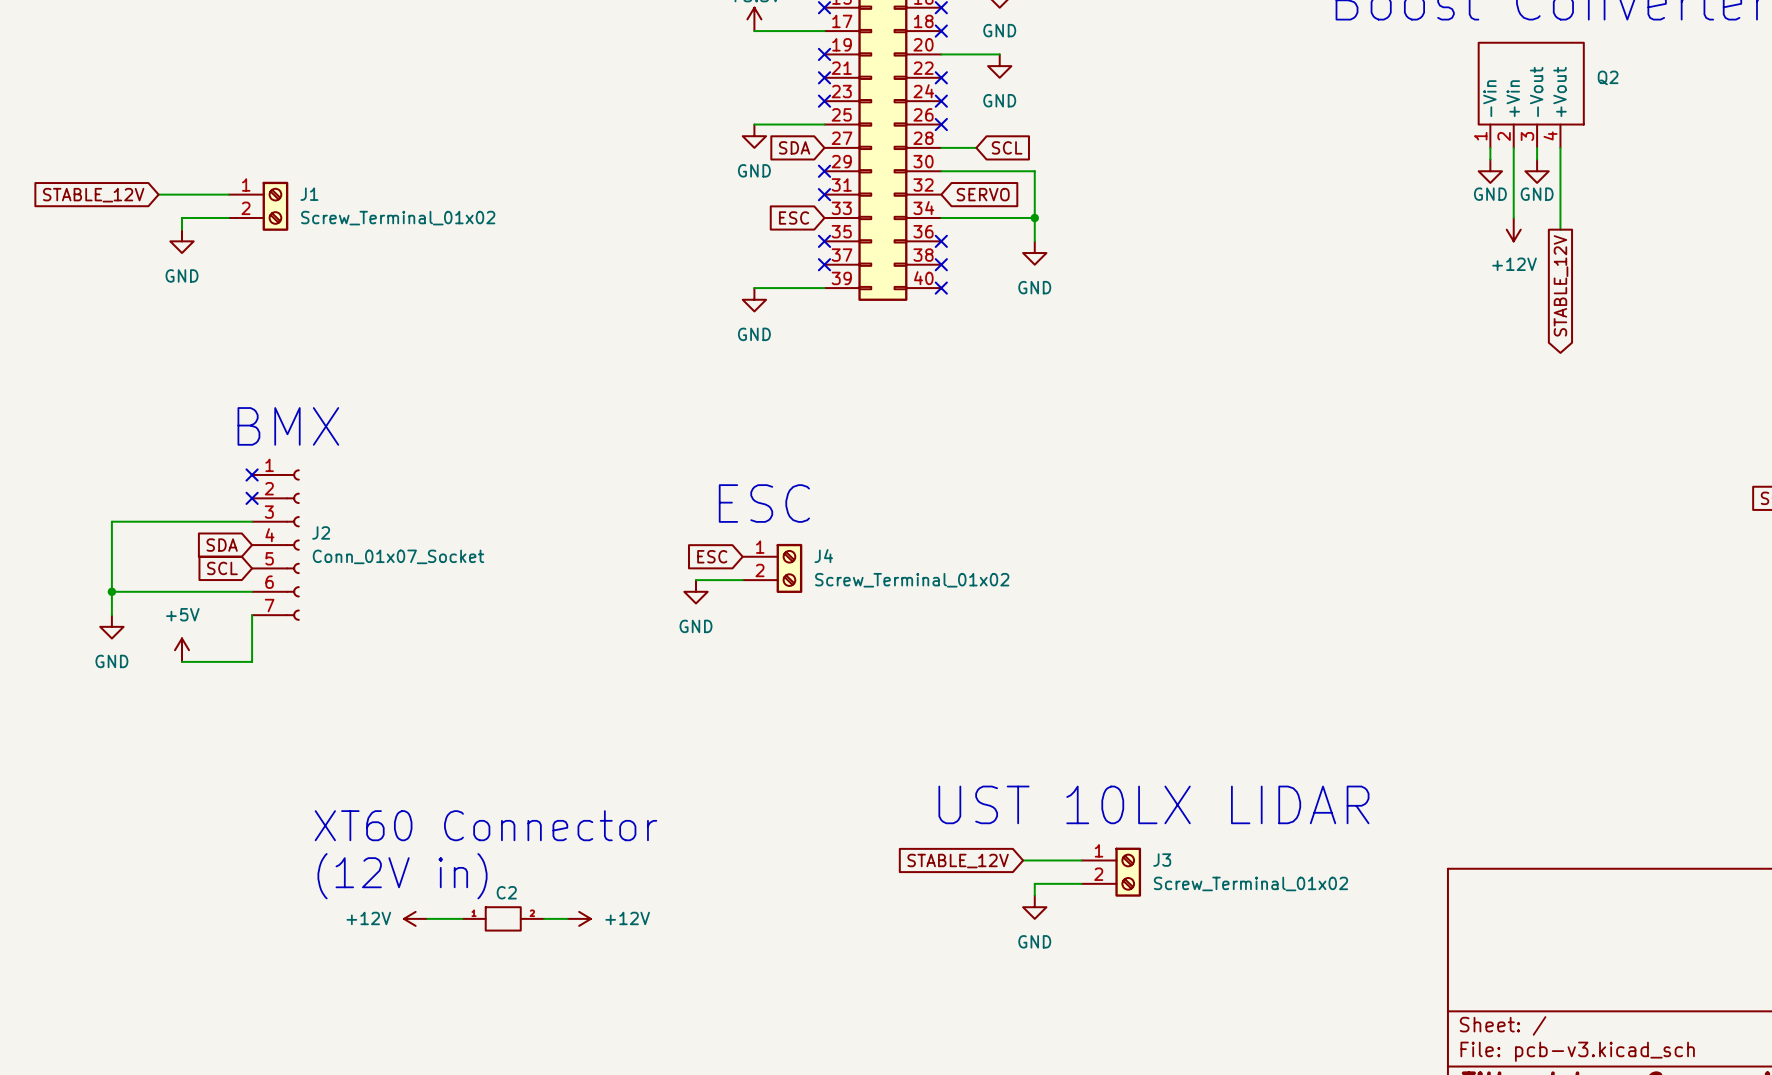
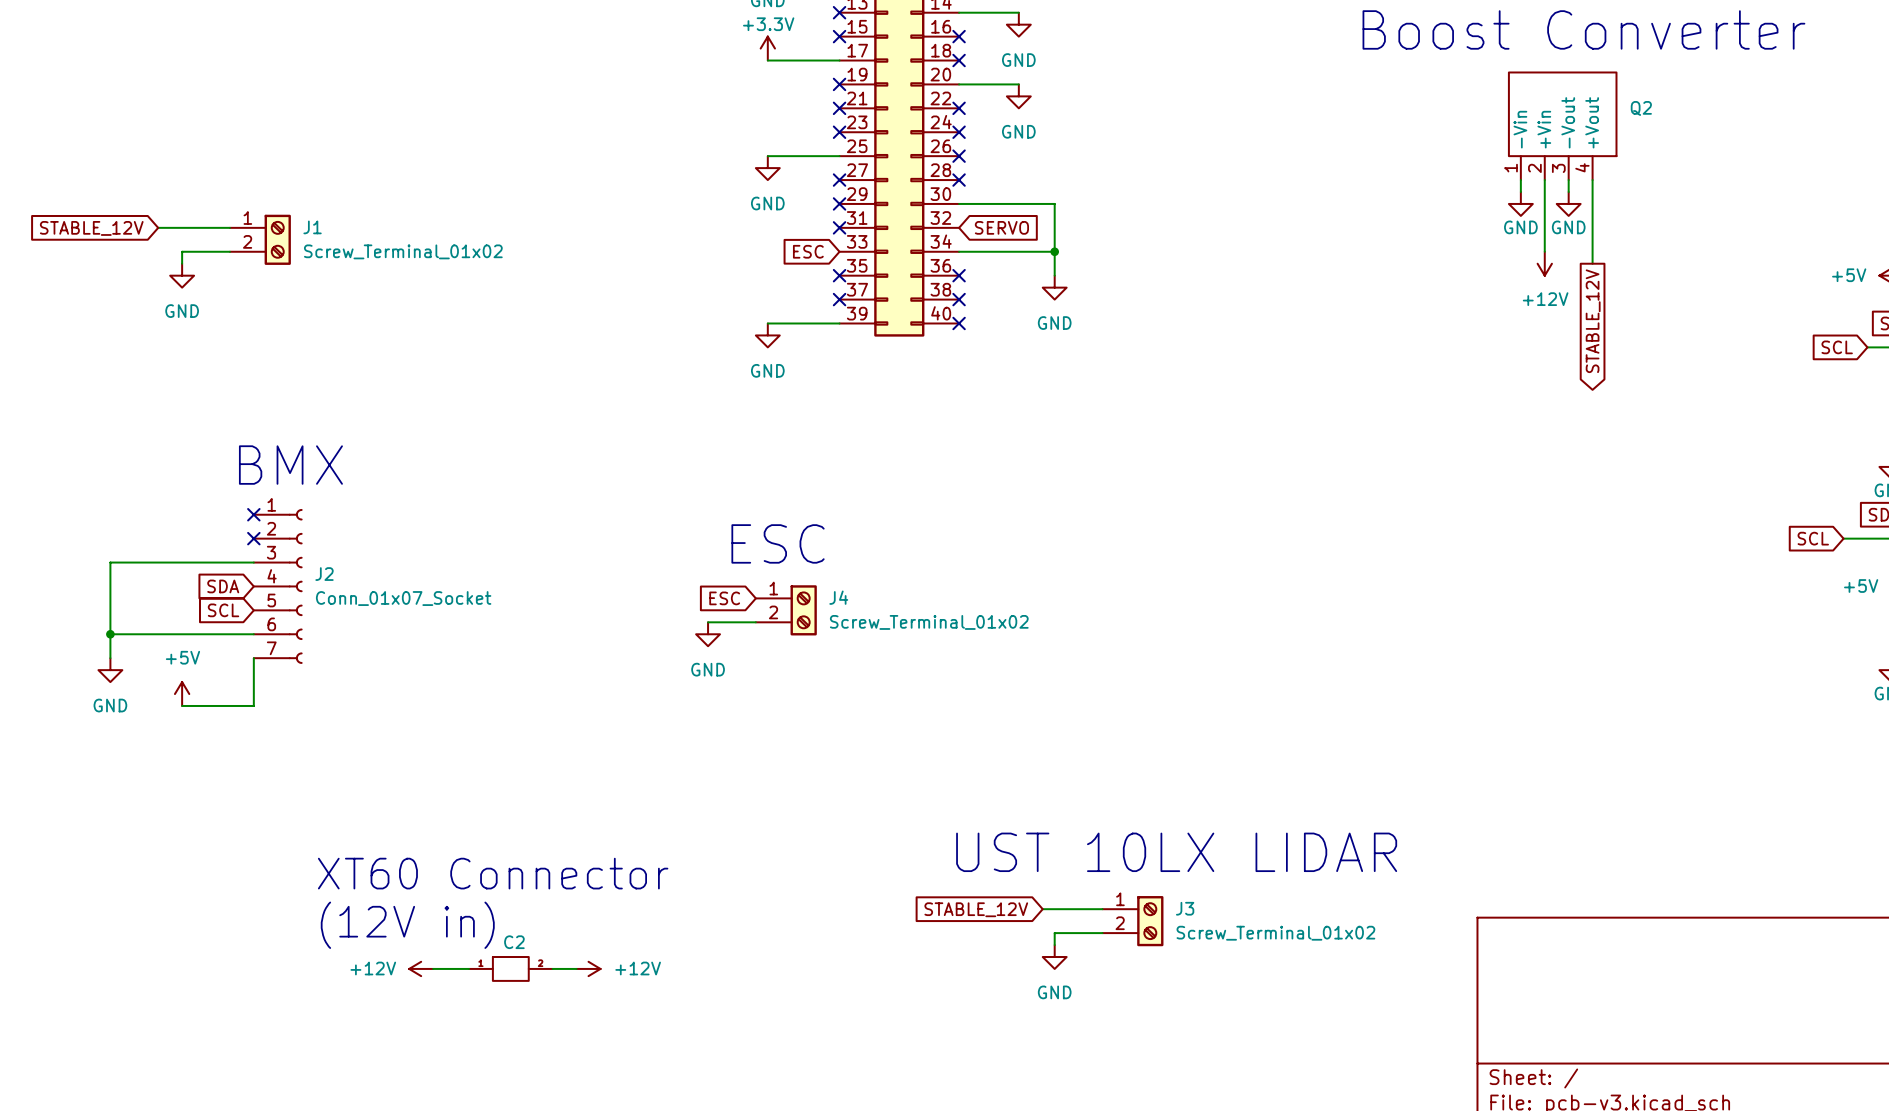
global label: SDA (794, 147) -> none
no-connect mark: none -> (839, 180)
wire: (941, 147) (976, 147) -> none
no-connect mark: none -> (959, 180)
global label: SCL (1007, 147) -> none

